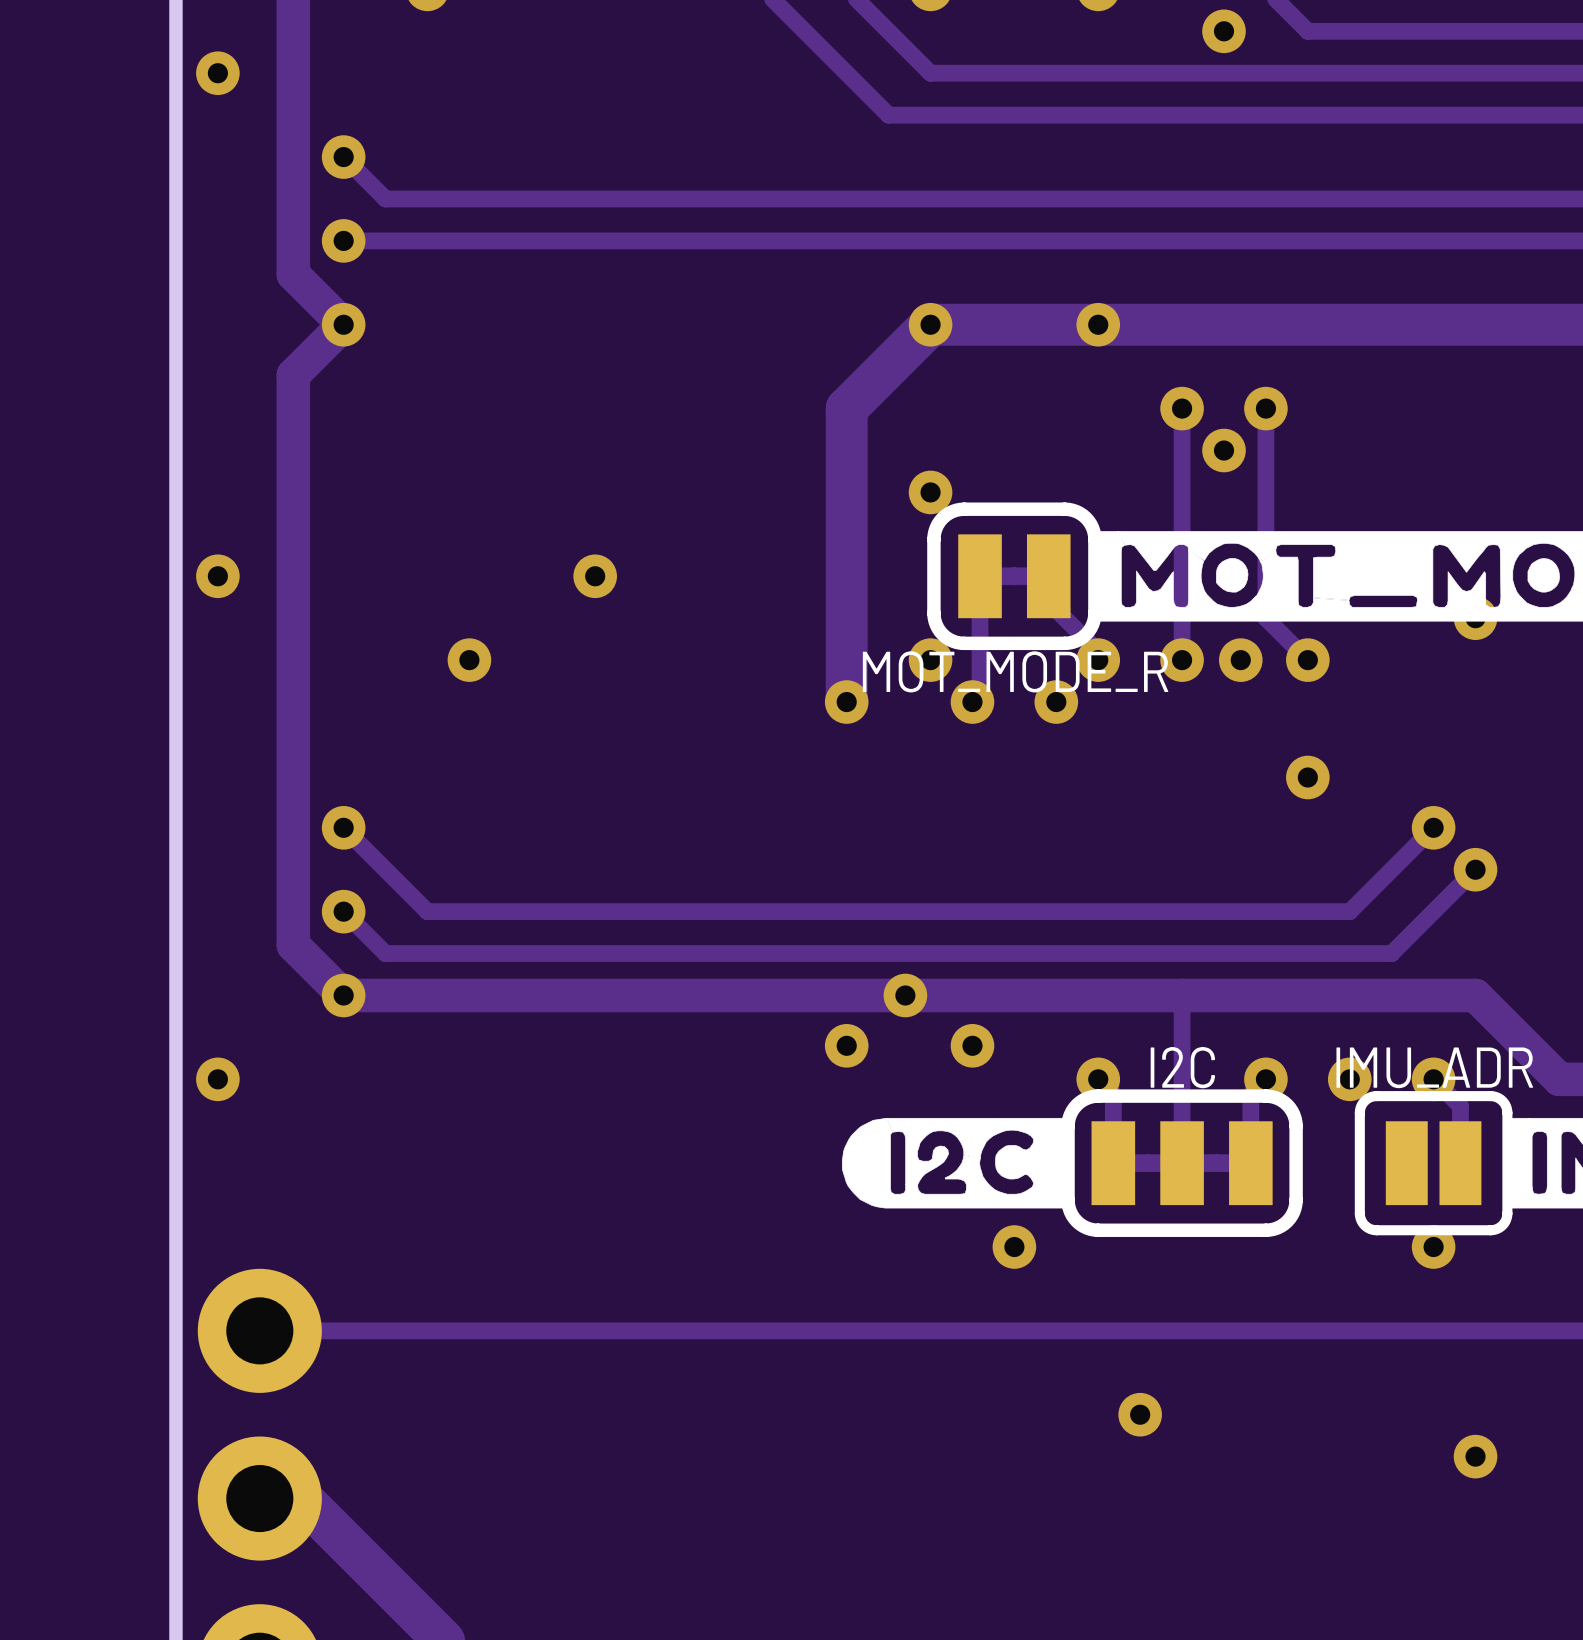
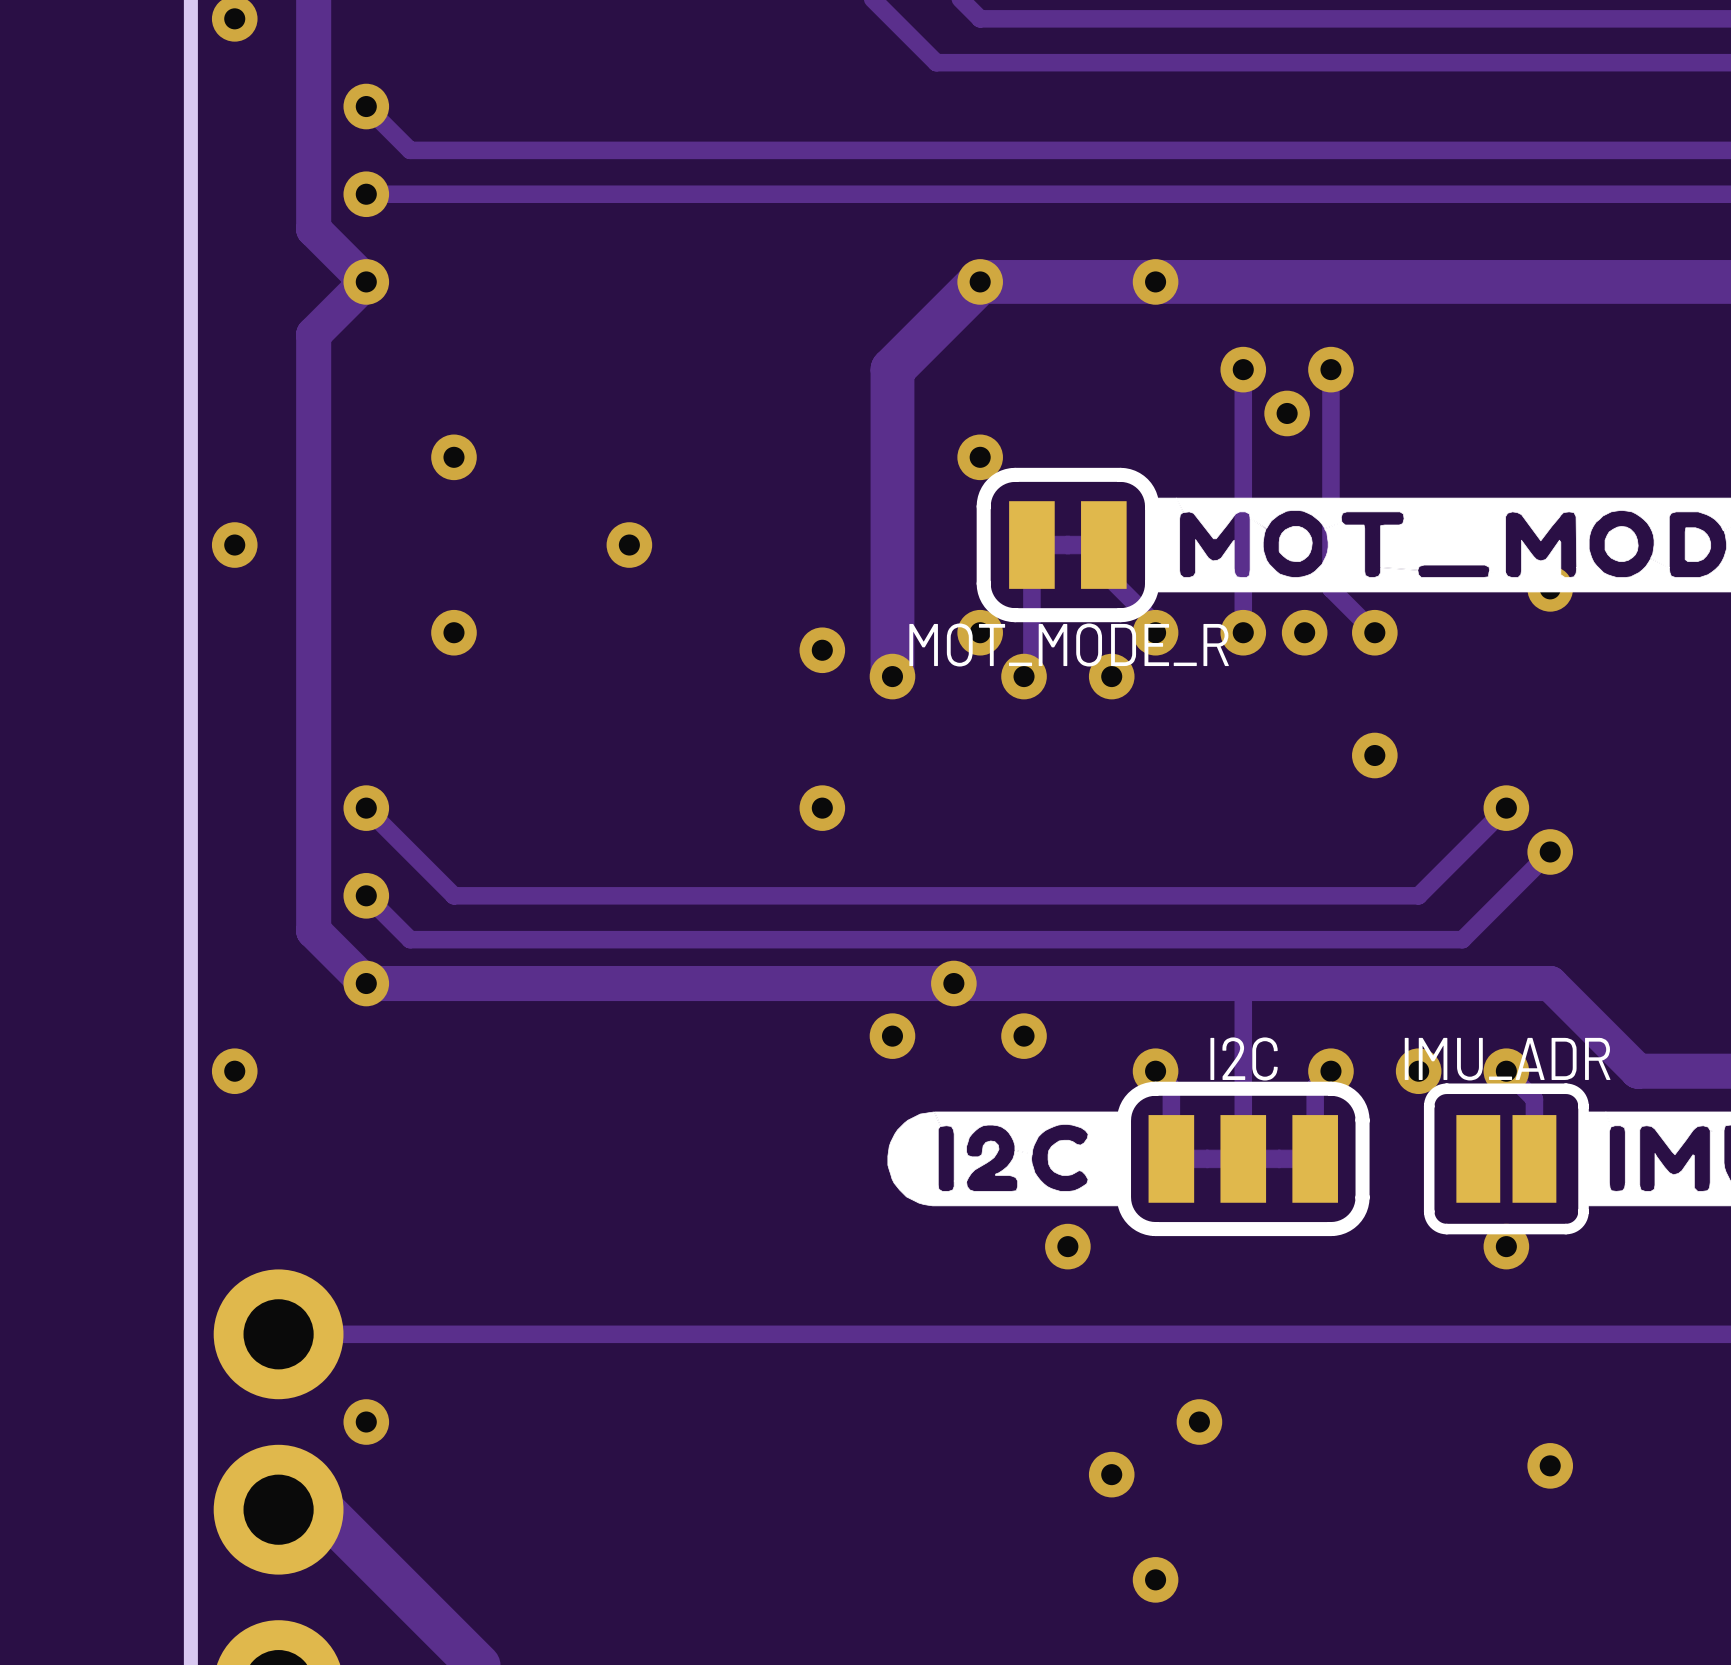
via: none -> (453, 457)
via position: (469, 660) -> (453, 632)
via: none -> (822, 650)
via: none -> (822, 808)
via: none -> (366, 1422)
via: none -> (1111, 1474)
via: none -> (1155, 1579)

